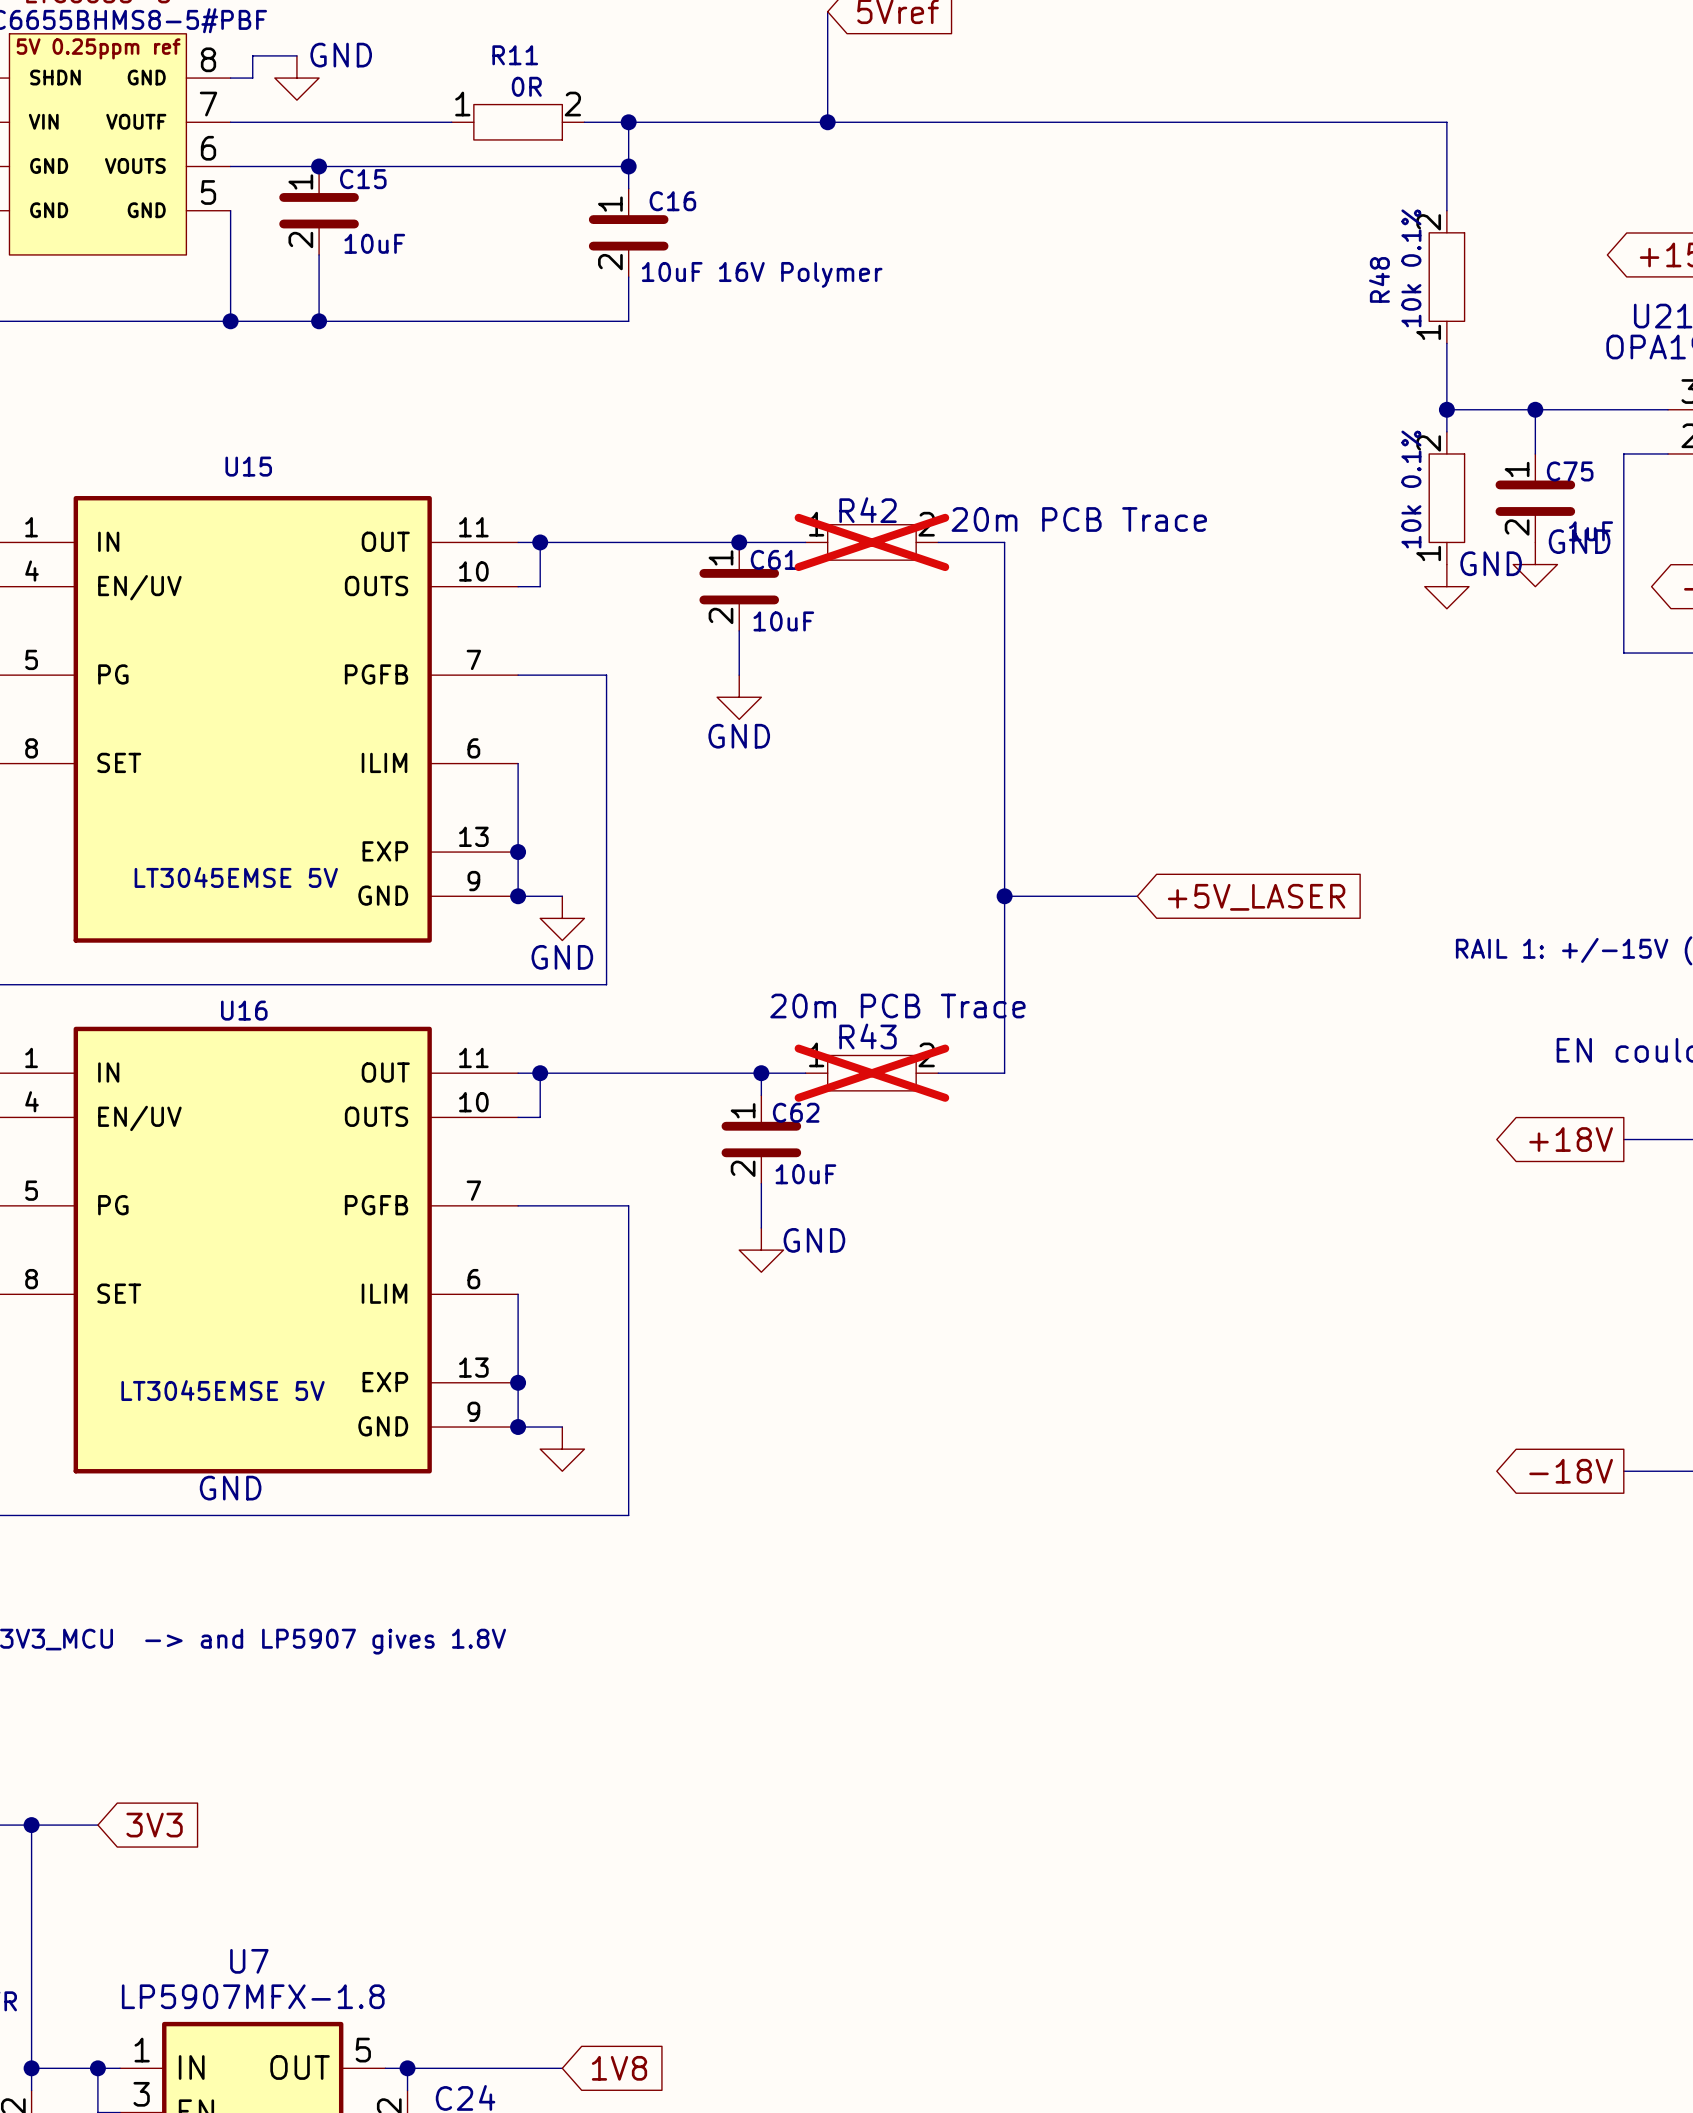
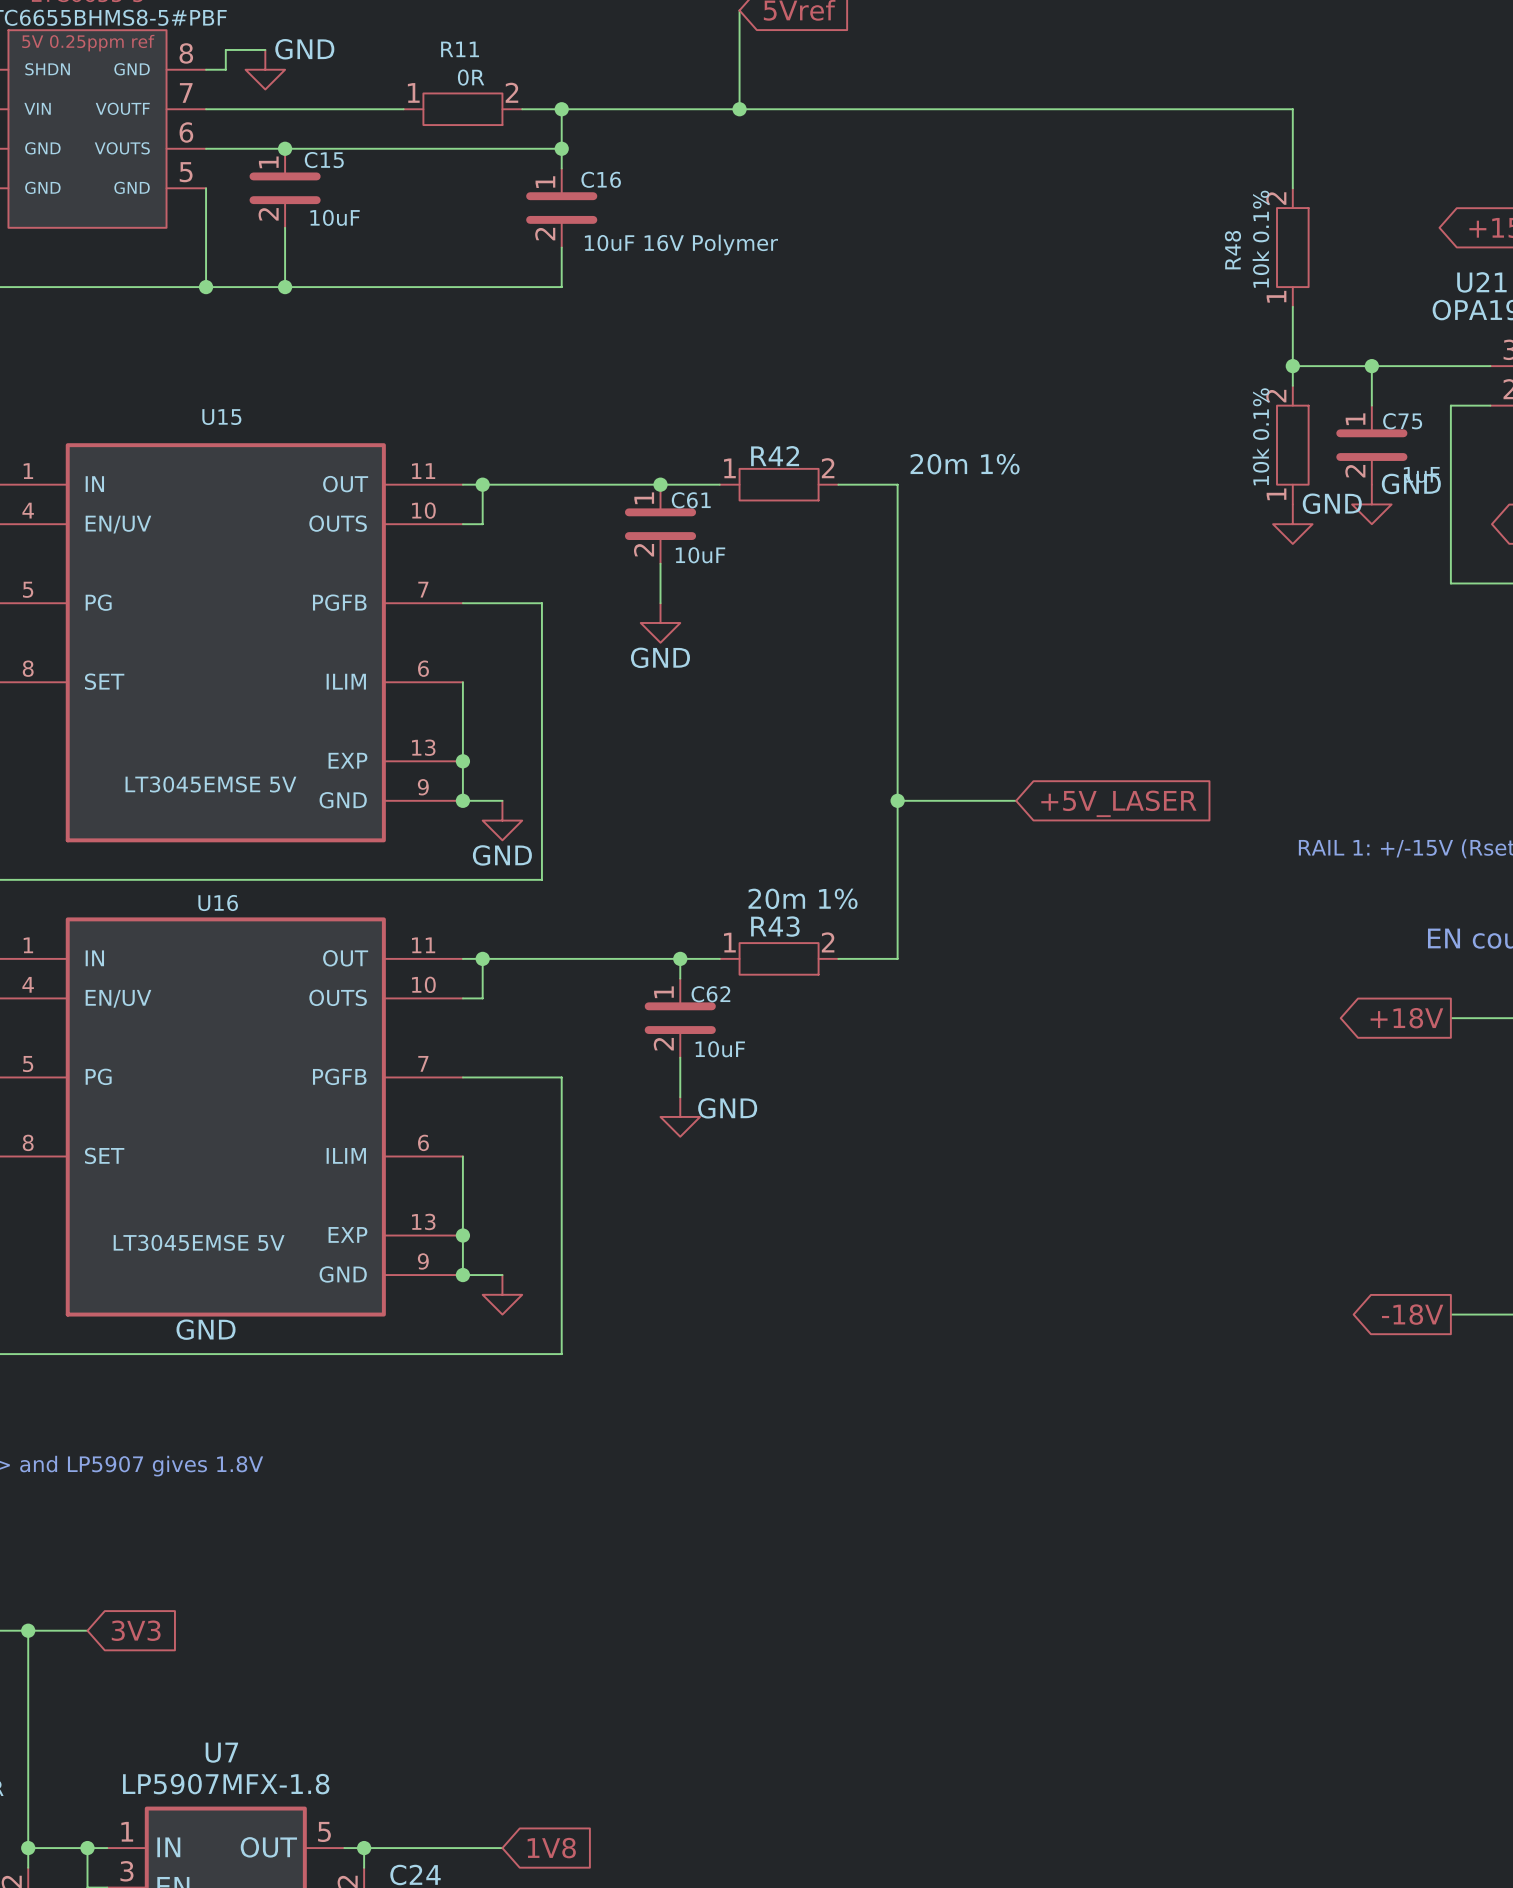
R42 value: 20m PCB Trace (1079, 519) -> 20m 1% (965, 464)
R42 do-not-place cross: (871, 542) -> none
R43 value: 20m PCB Trace (897, 1006) -> 20m 1% (803, 898)
R43 do-not-place cross: (871, 1073) -> none

